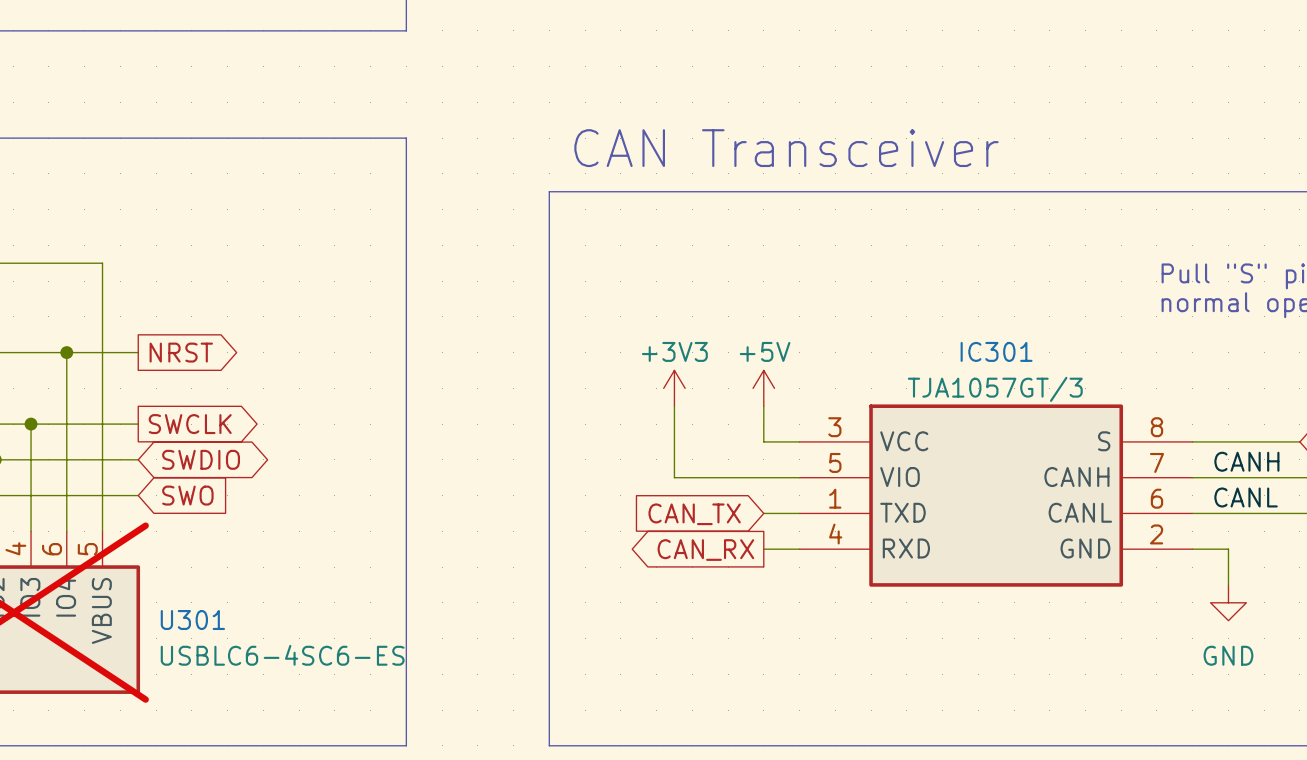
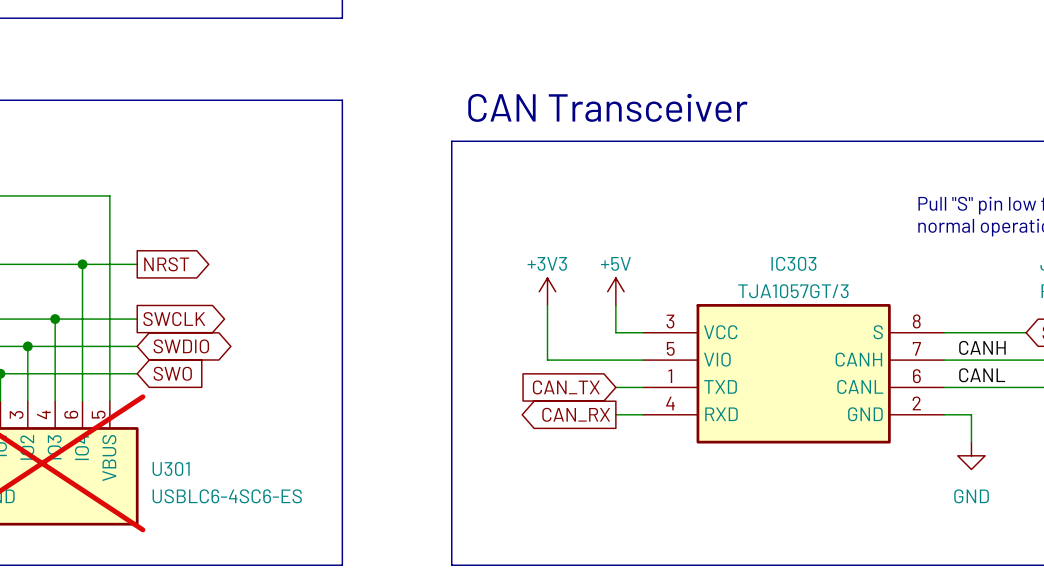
IC301 name: IC301 (996, 351) -> IC303 (793, 263)

